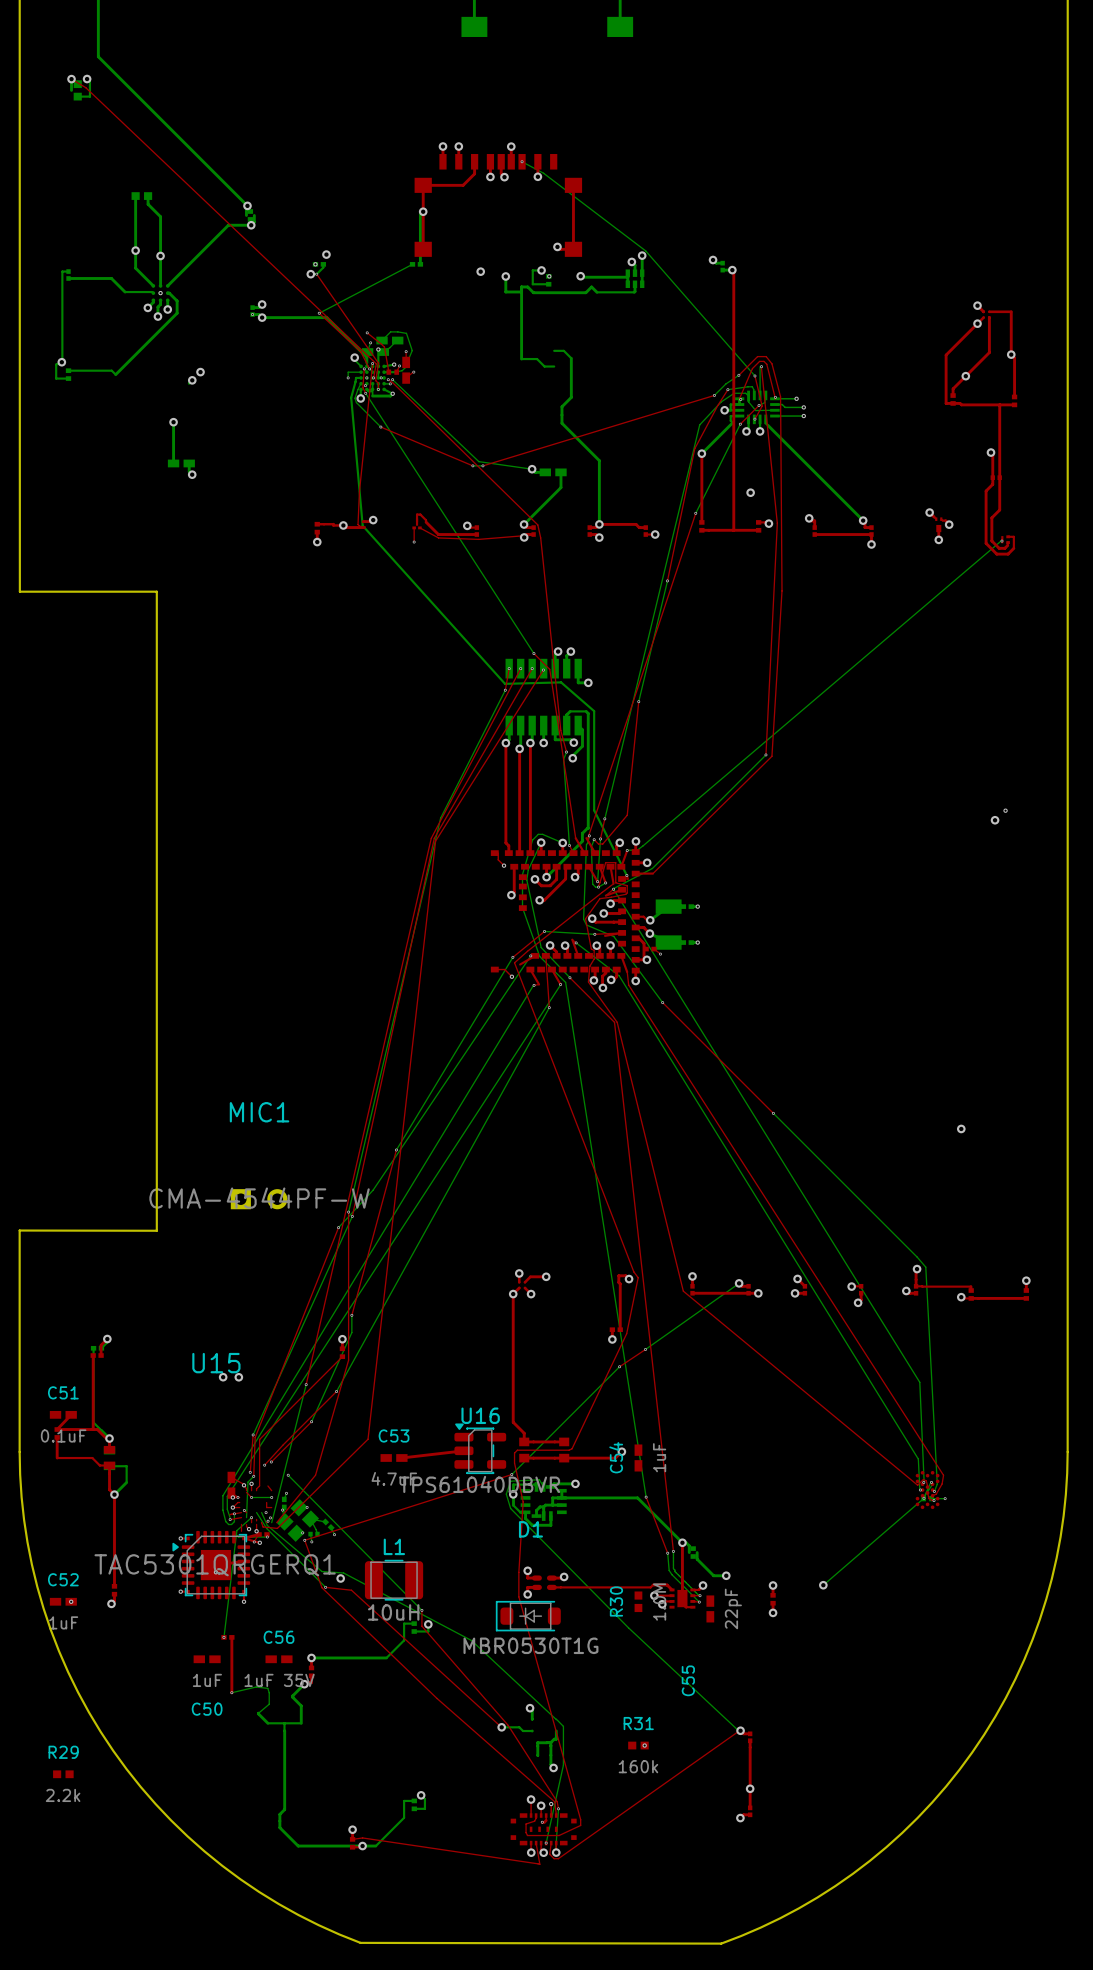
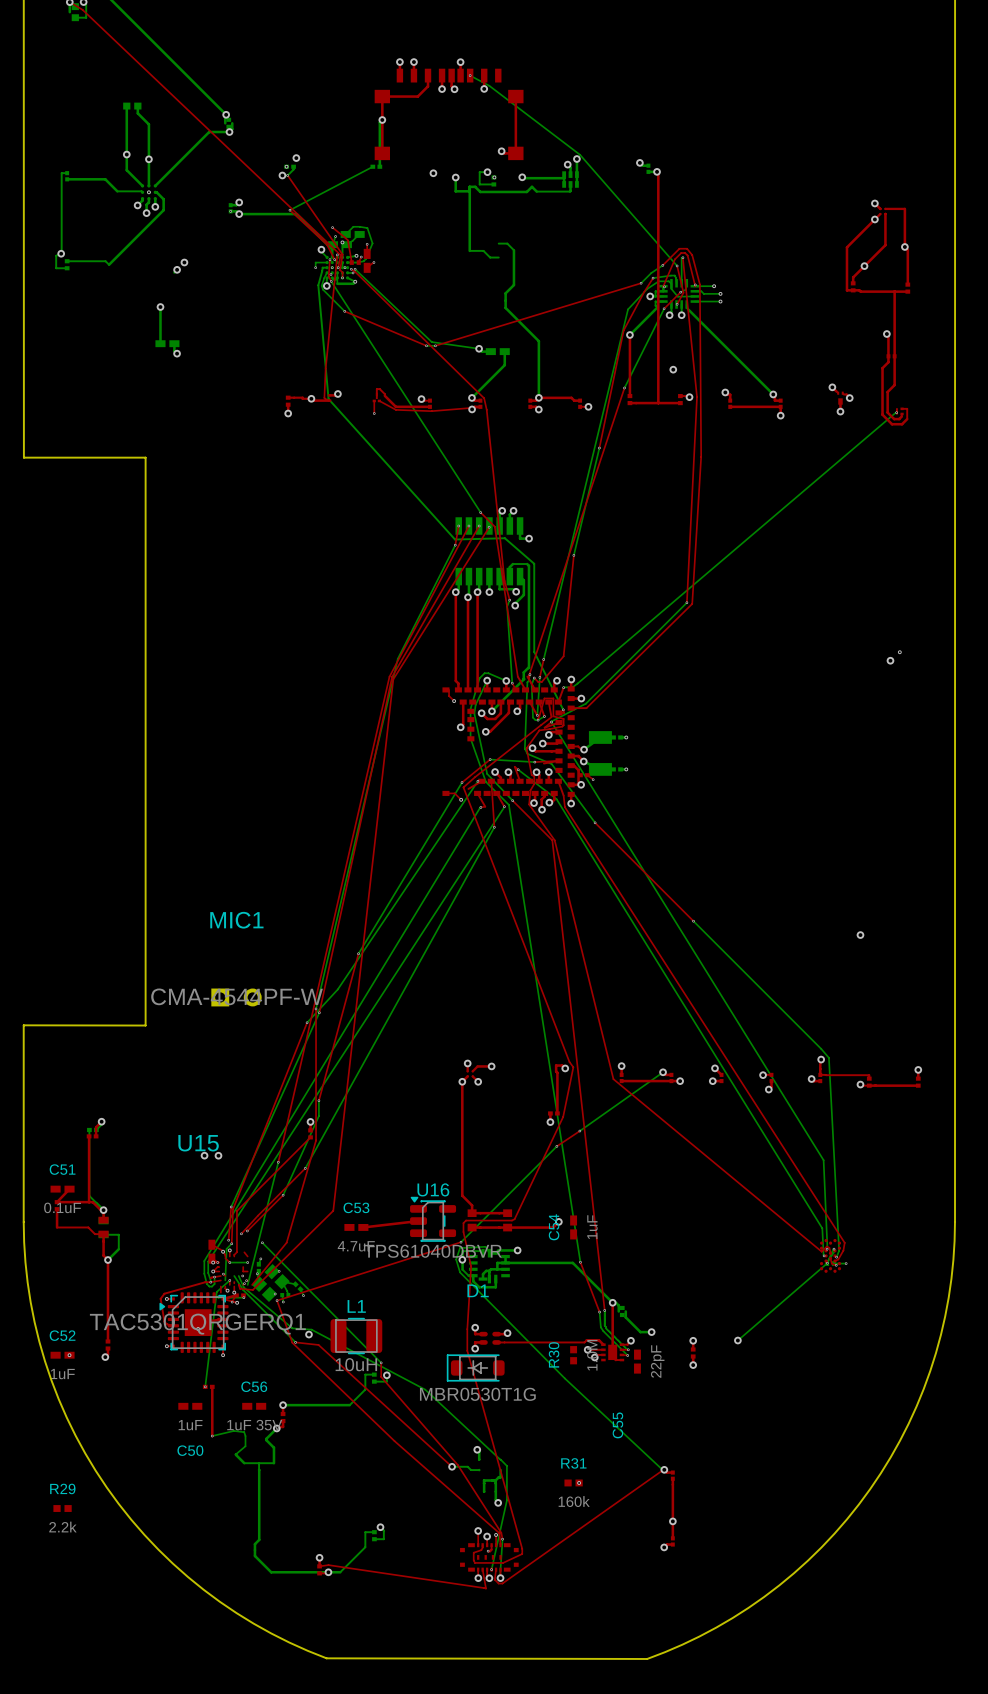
top track: none -> (210, 1282) (164, 1293) (160, 1298) (164, 1321) (173, 1325)

